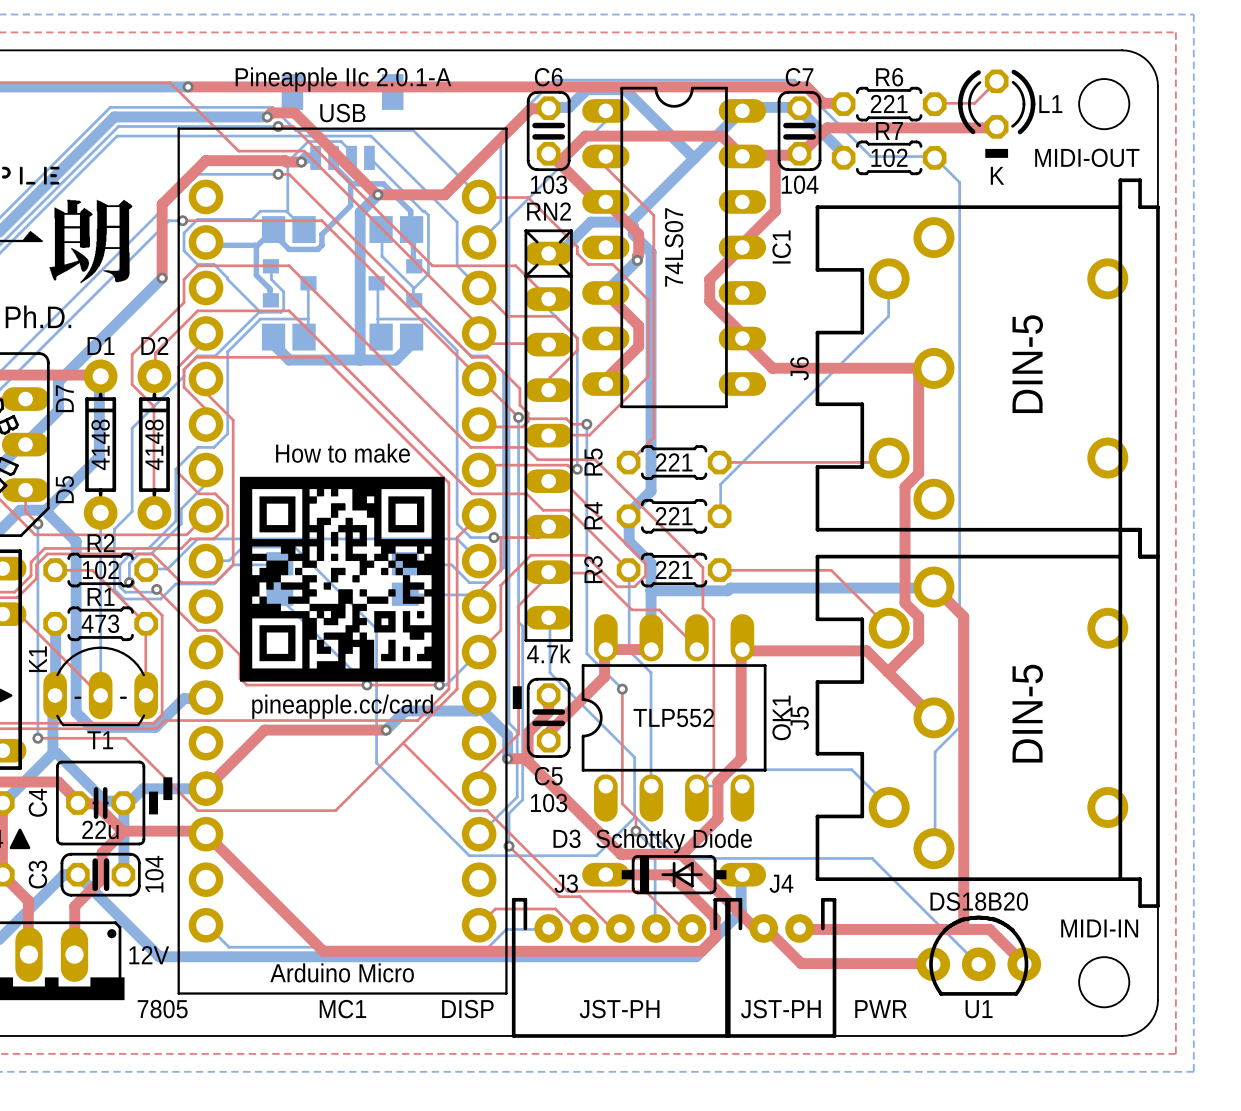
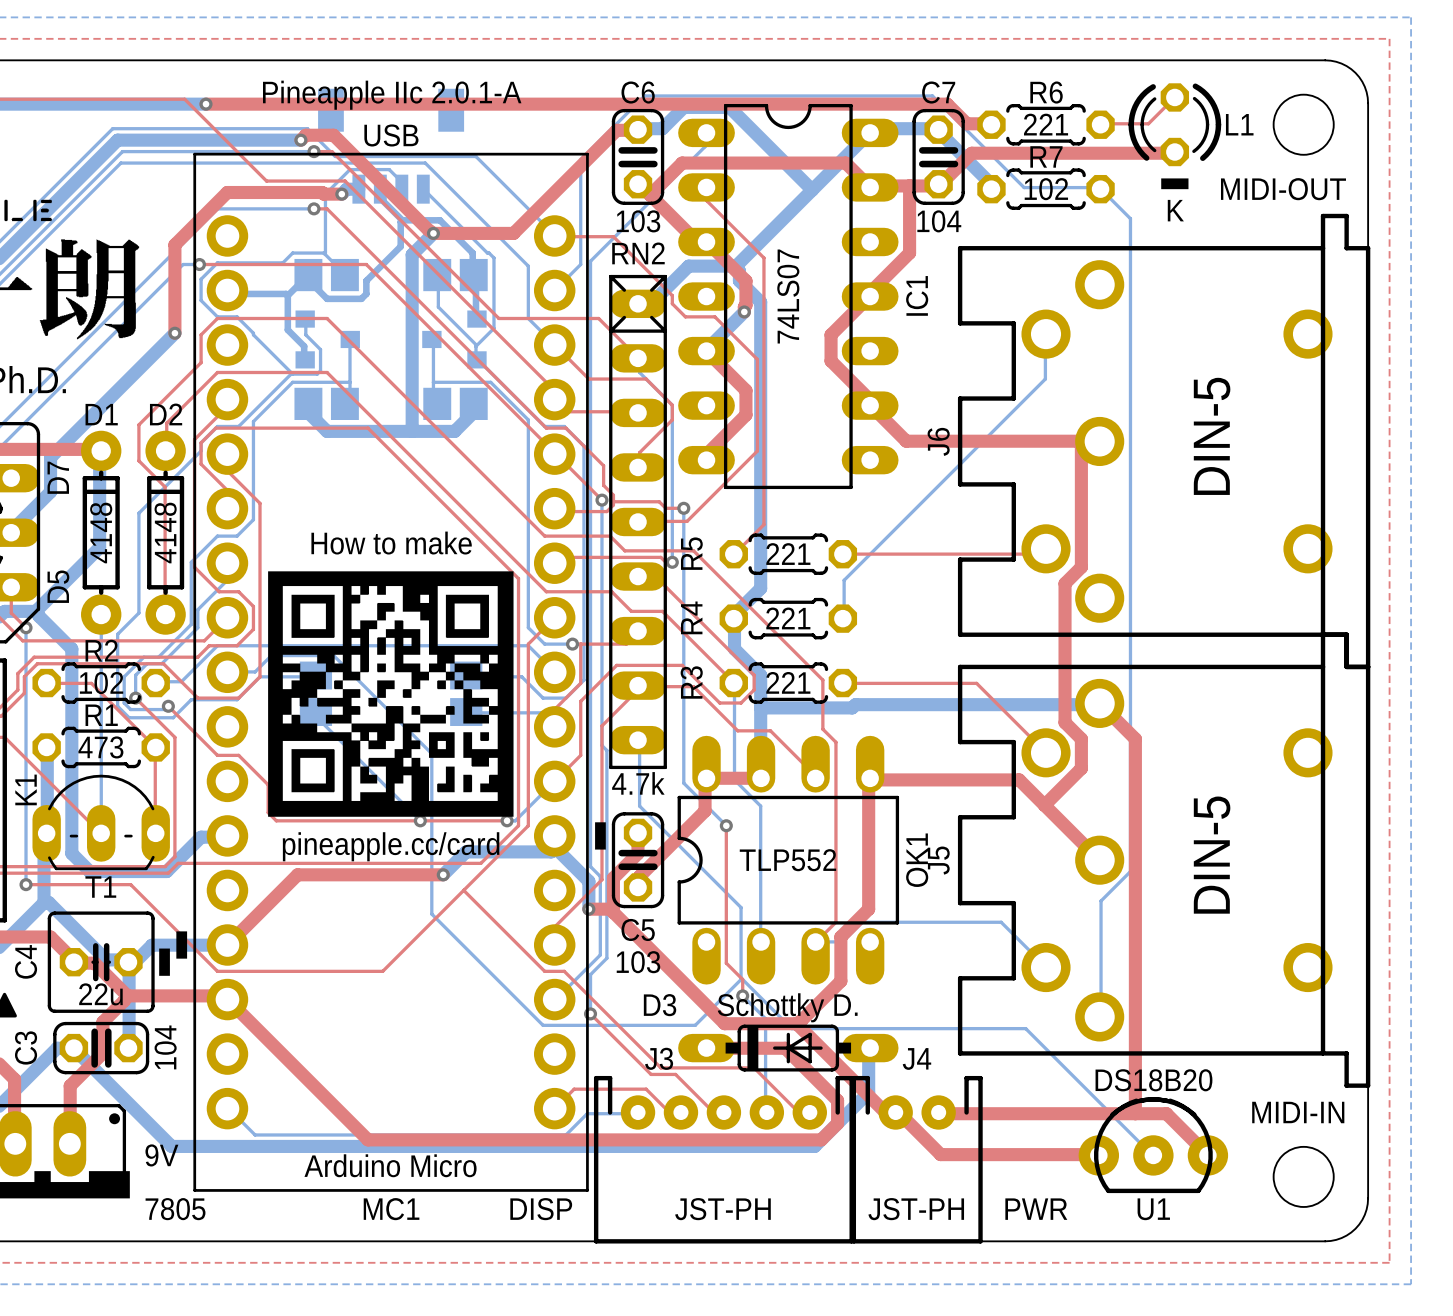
text: Schottky Diode (674, 841) -> Schottky D. (787, 1007)
text: 12V (149, 955) -> 9V (161, 1155)

